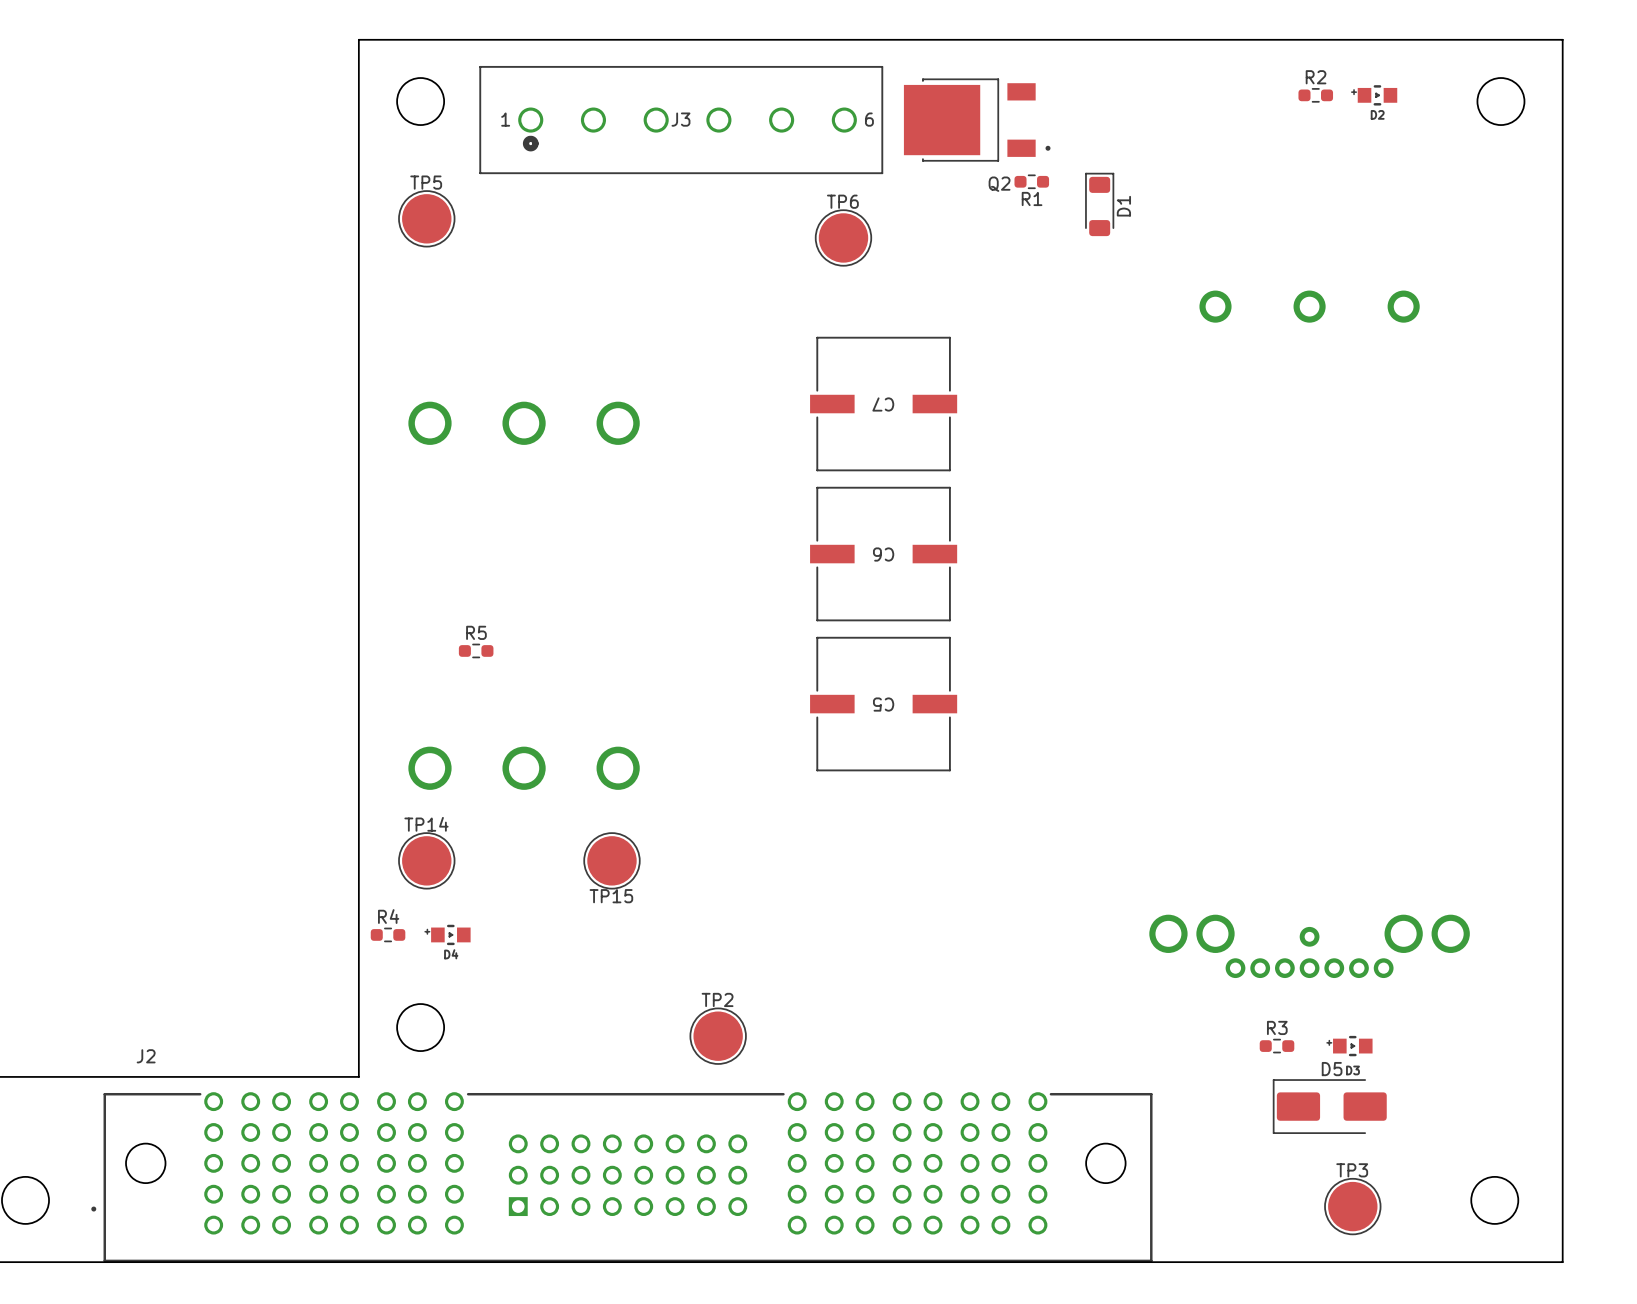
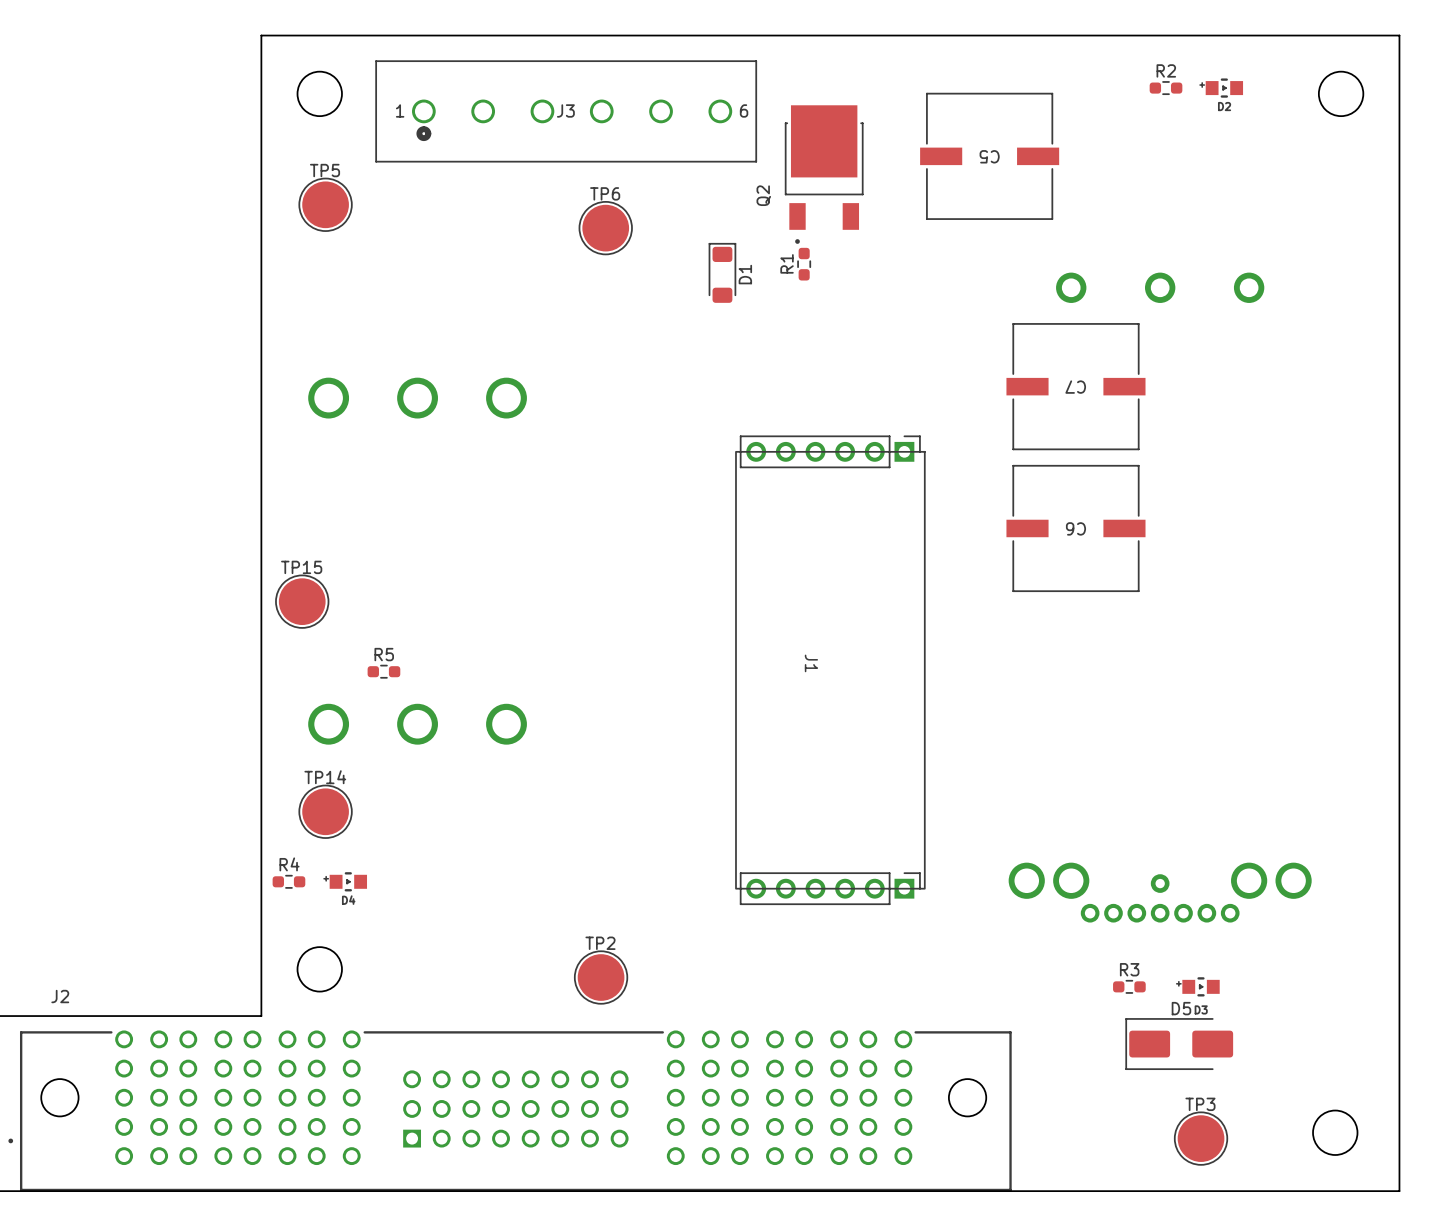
Q2 rotation: 0° (977, 120) -> 90° clockwise (824, 174)
R1 rotation: 0° (1031, 181) -> 90° clockwise (804, 264)
R1 position: (1031, 181) -> (804, 264)
D1 position: (1099, 204) -> (722, 272)
TP6 position: (843, 237) -> (605, 228)
C7 position: (883, 404) -> (1075, 386)
C6 position: (883, 554) -> (1075, 528)
R5 position: (476, 650) -> (383, 671)
C5 position: (883, 704) -> (989, 156)
J1: none -> (830, 670)
TP15 position: (611, 860) -> (302, 601)
TP15 name position: TP15 (611, 896) -> TP15 (301, 567)

